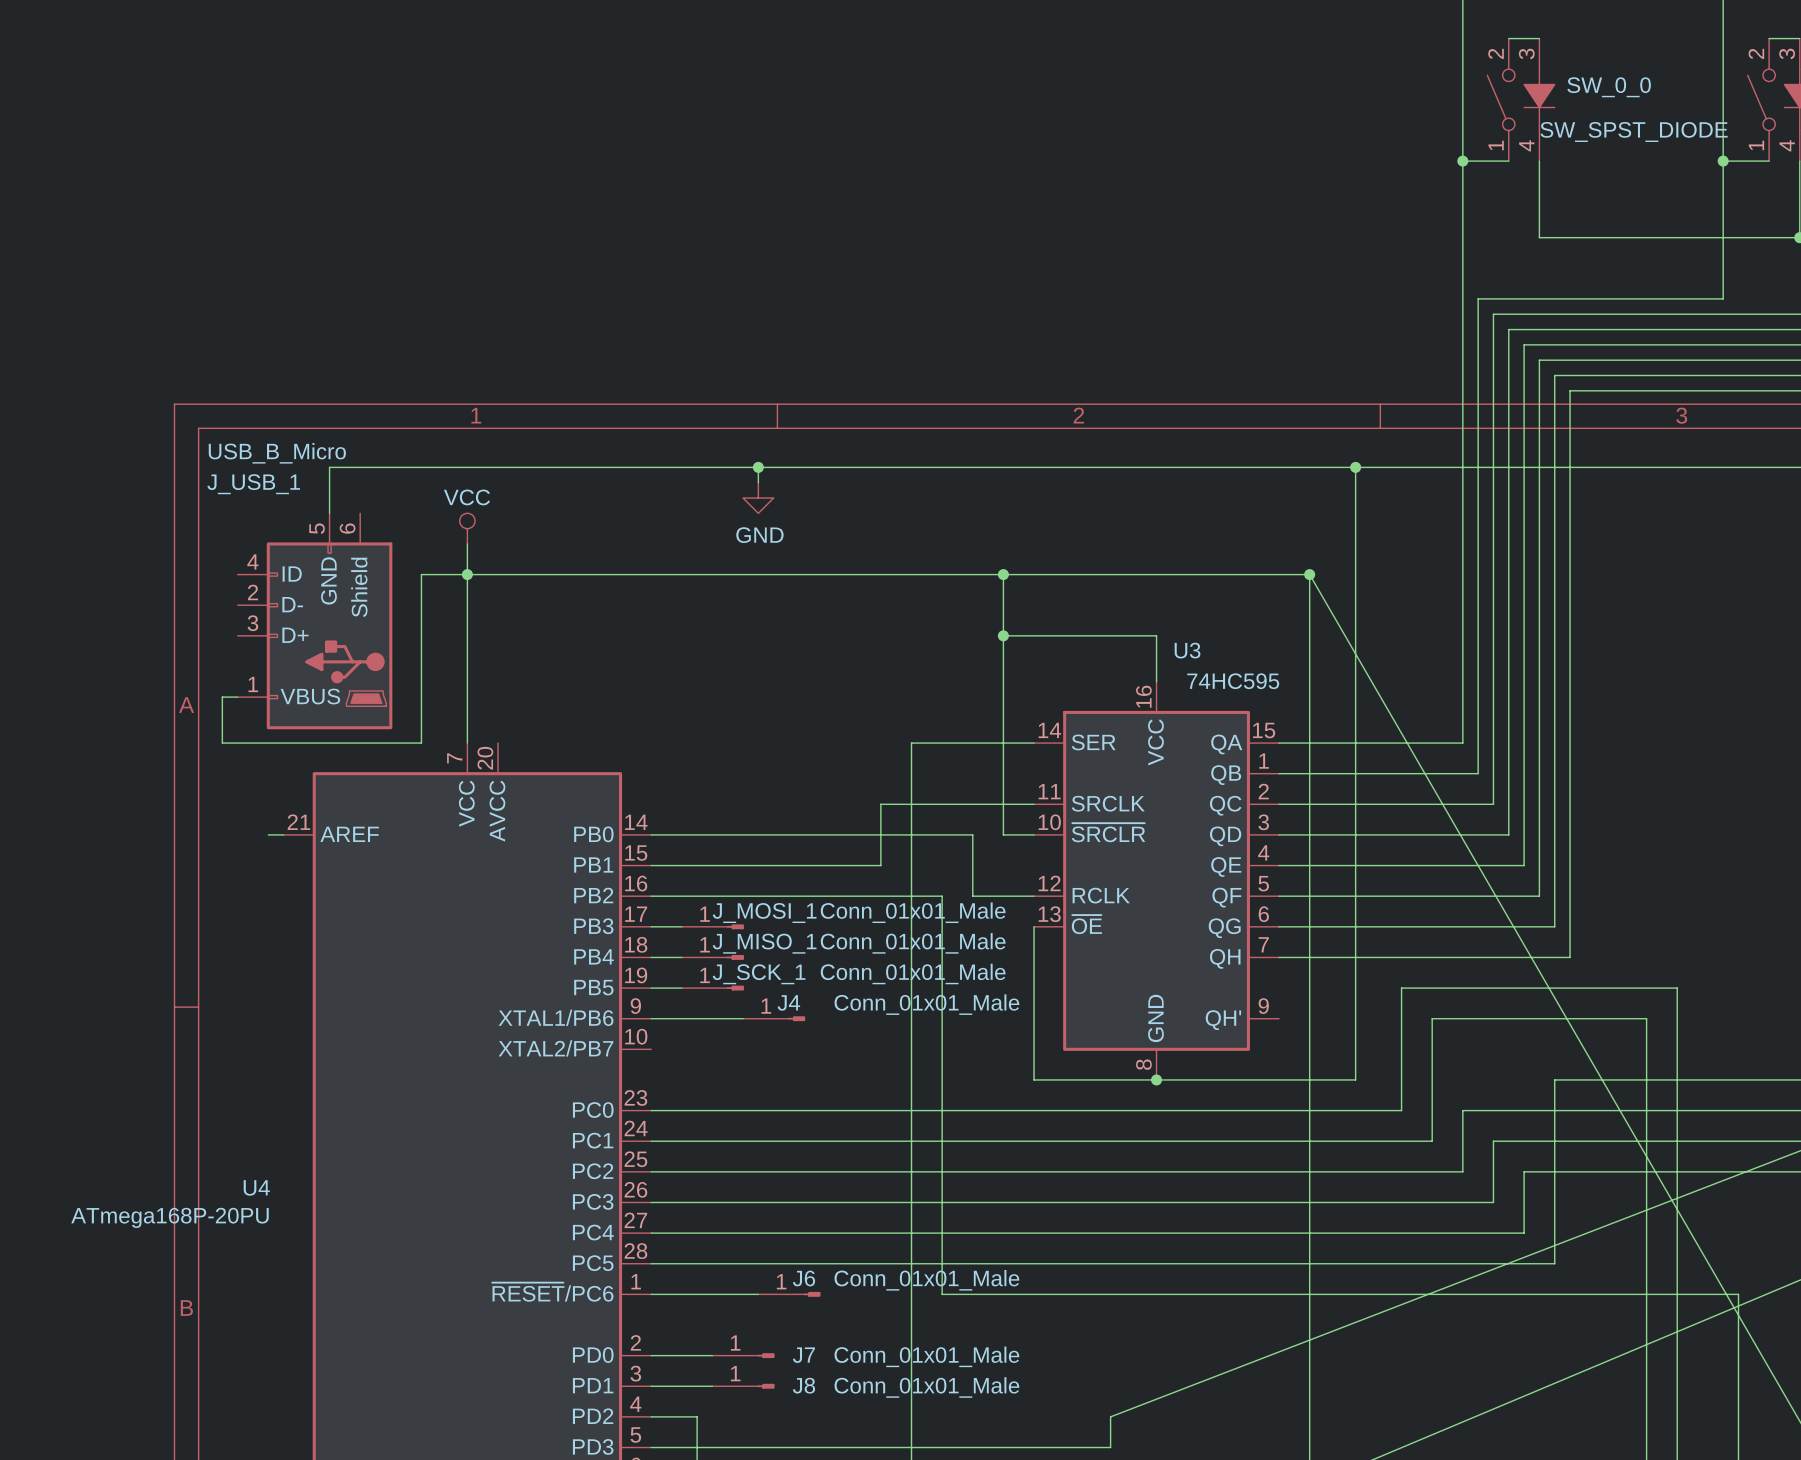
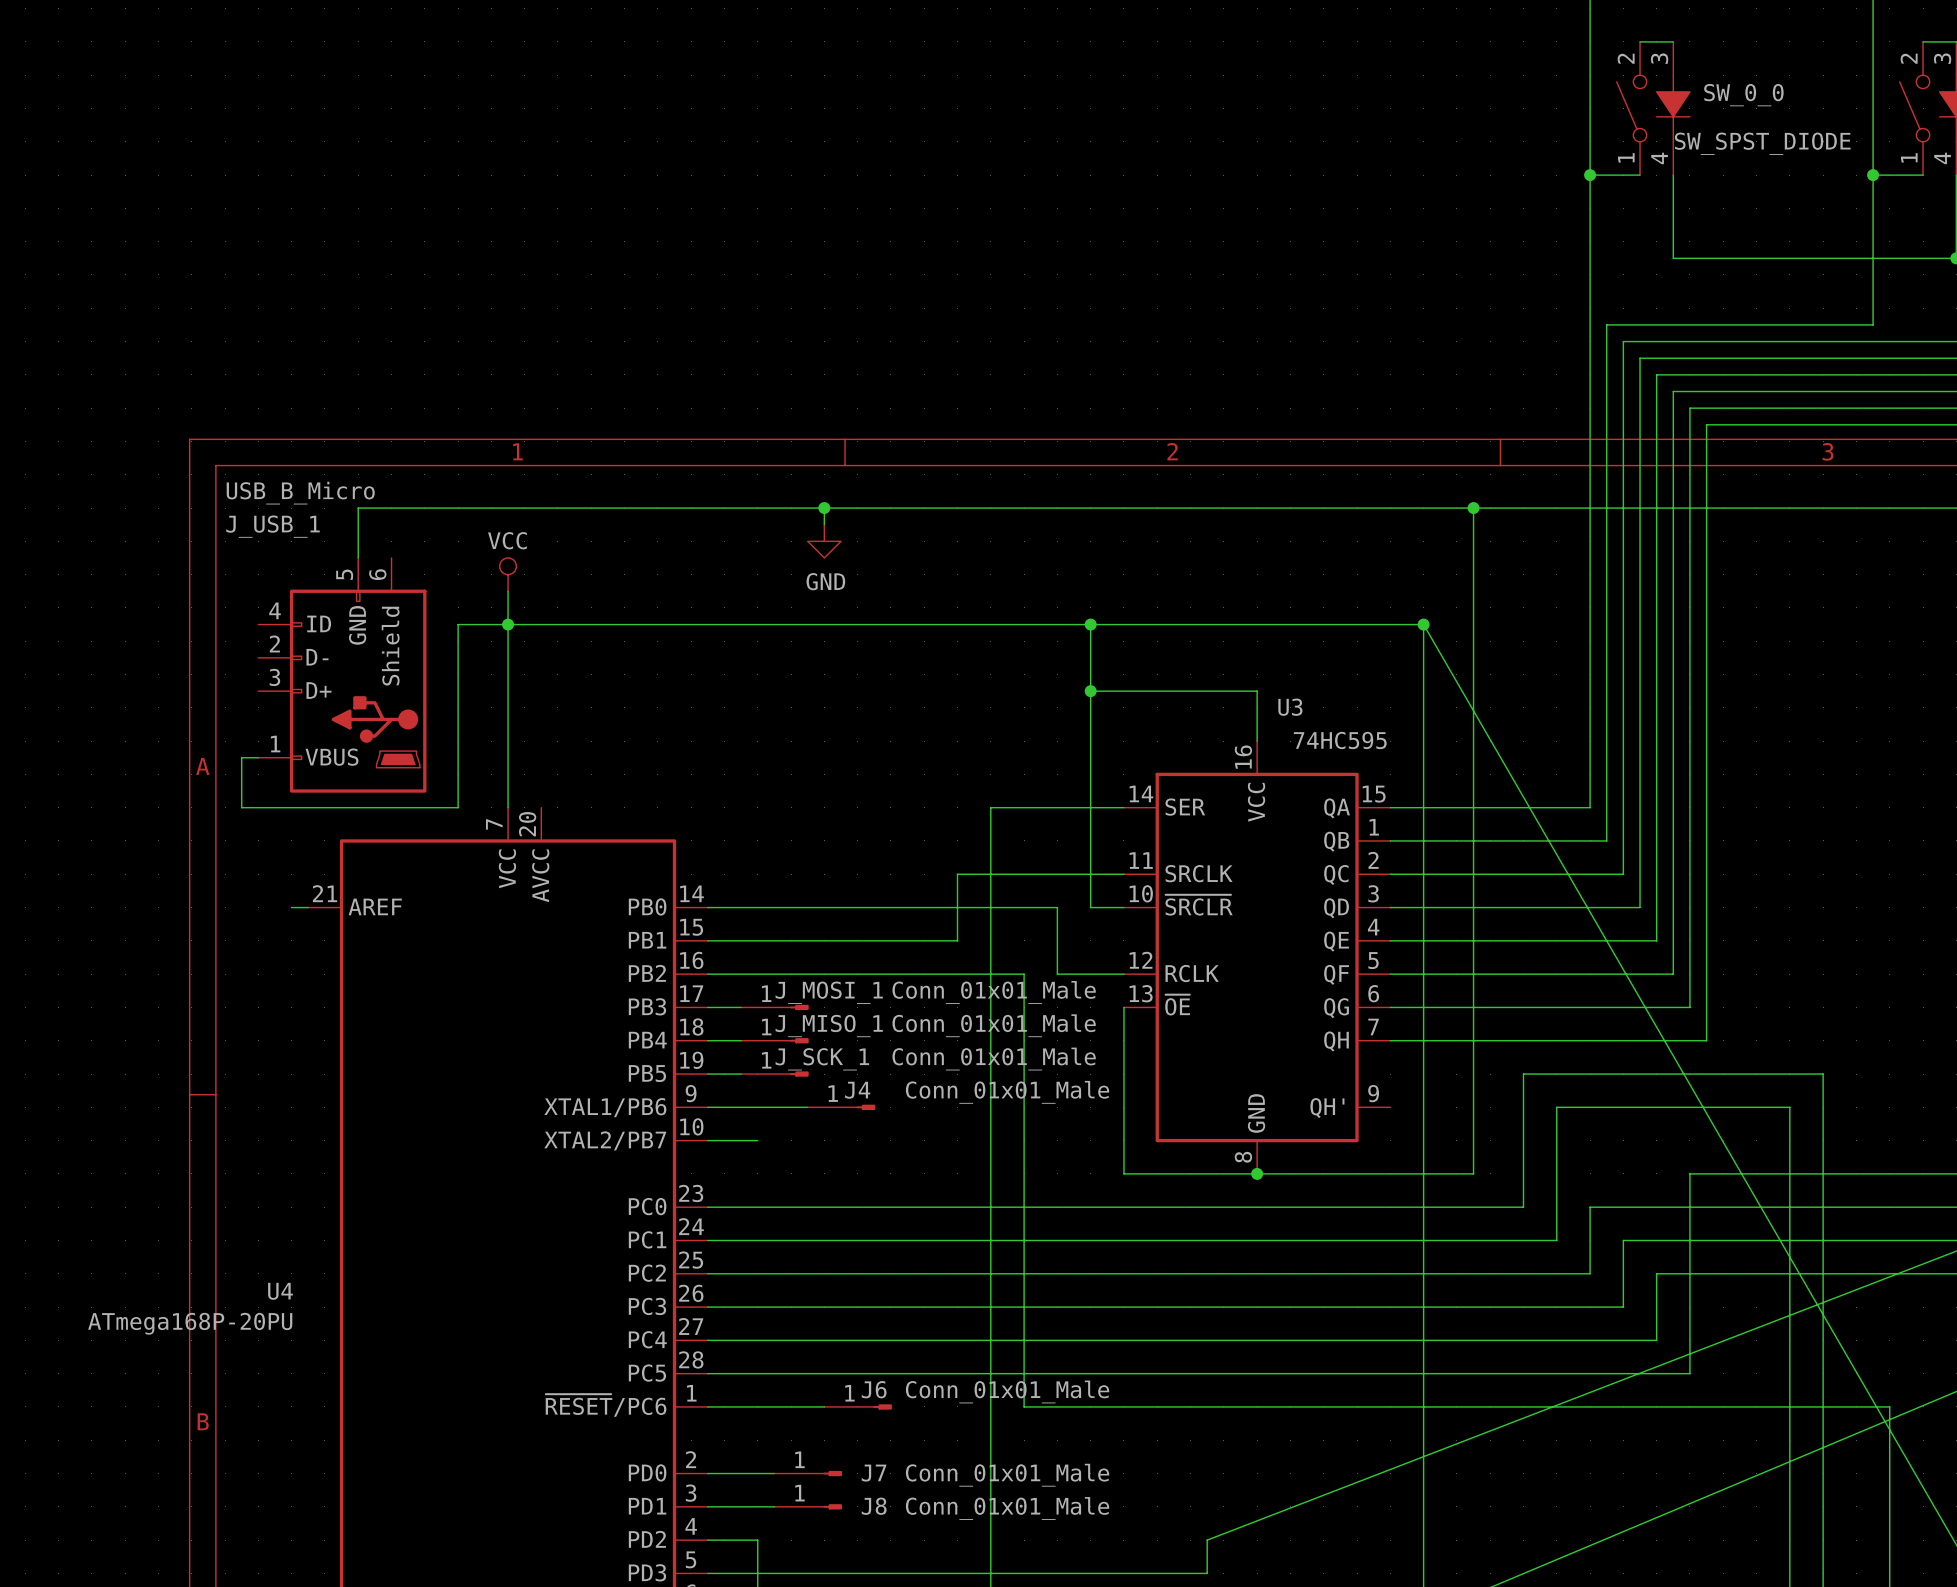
wire: none -> (707, 1140) (757, 1140)

